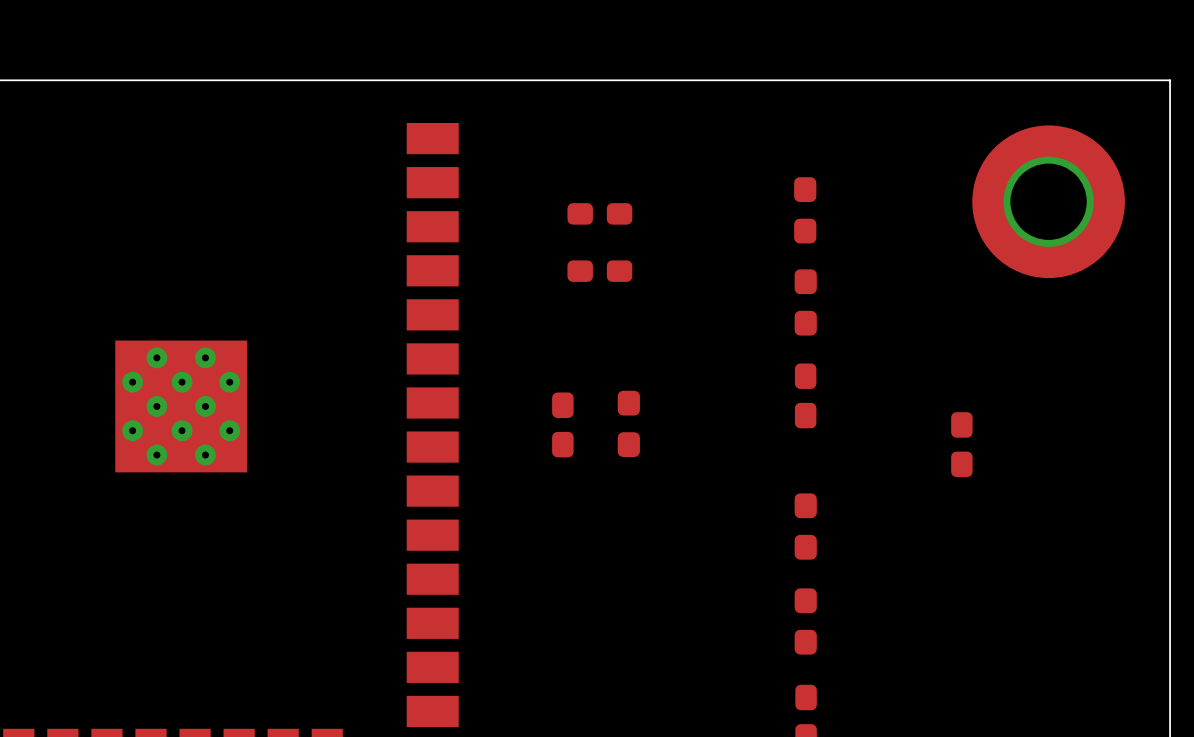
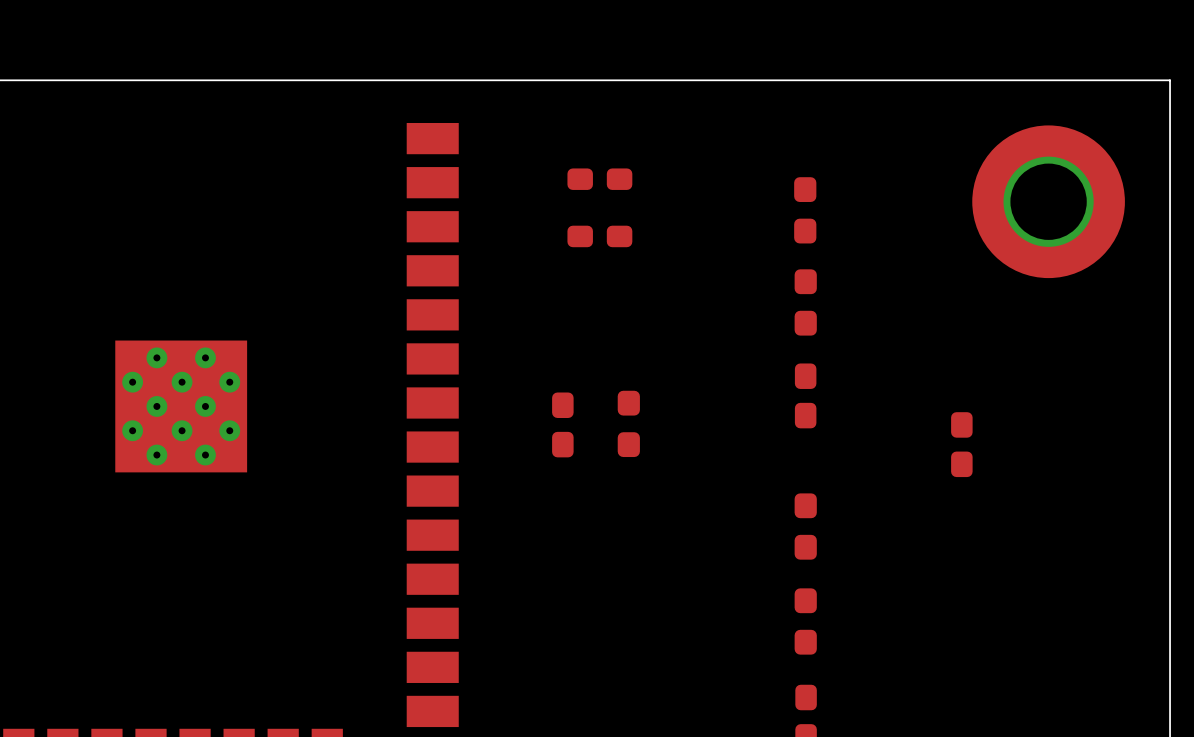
part: none -> (599, 179)
part: (599, 213) -> none
part: none -> (599, 236)
part: (599, 271) -> none

